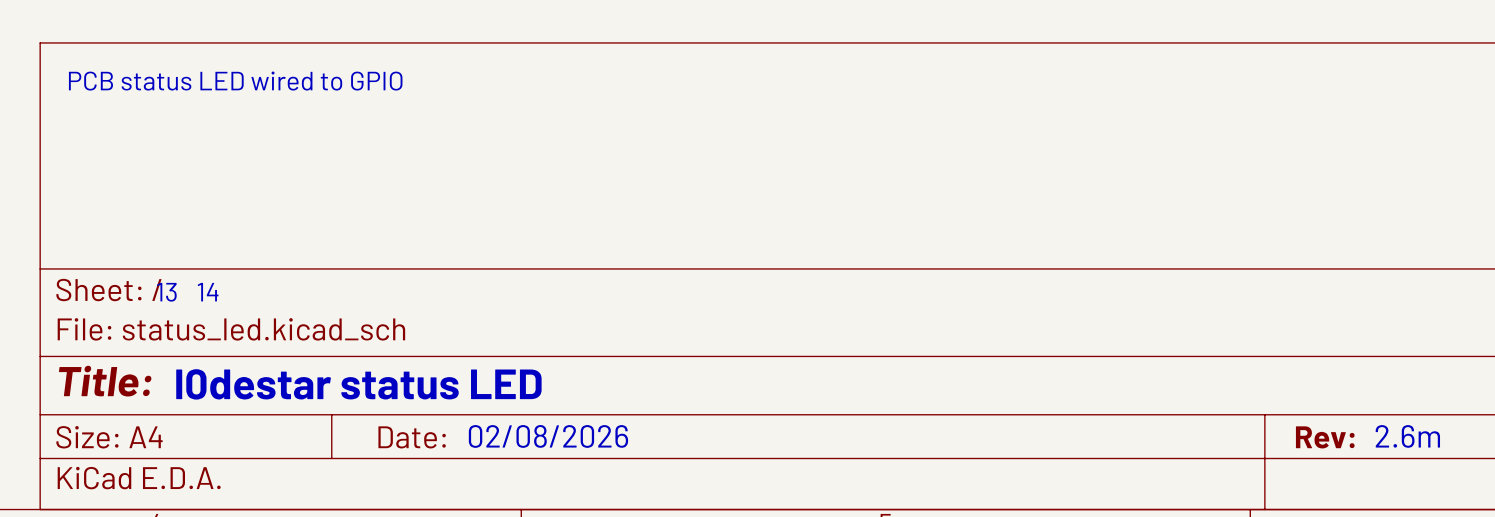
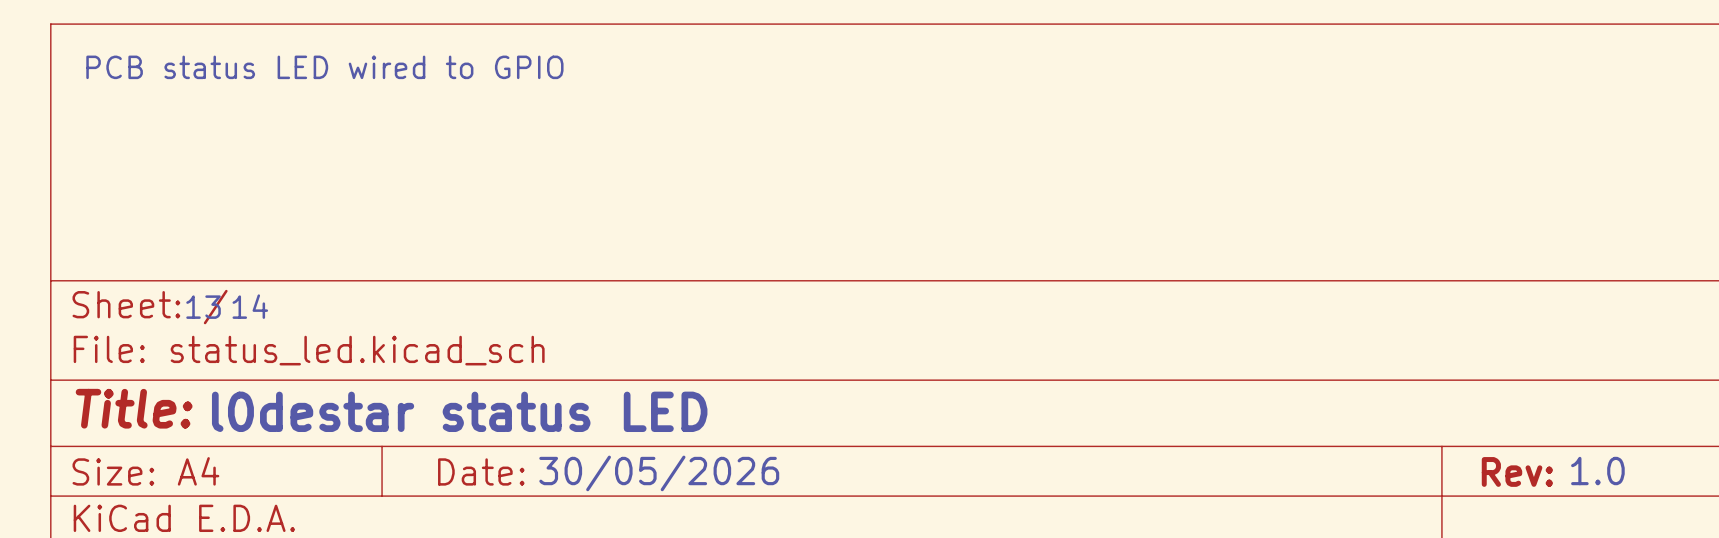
text: 02/08/2026 (548, 436) -> 30/05/2026 (659, 473)
text: 2.6m (1407, 436) -> 1.0 (1597, 471)

